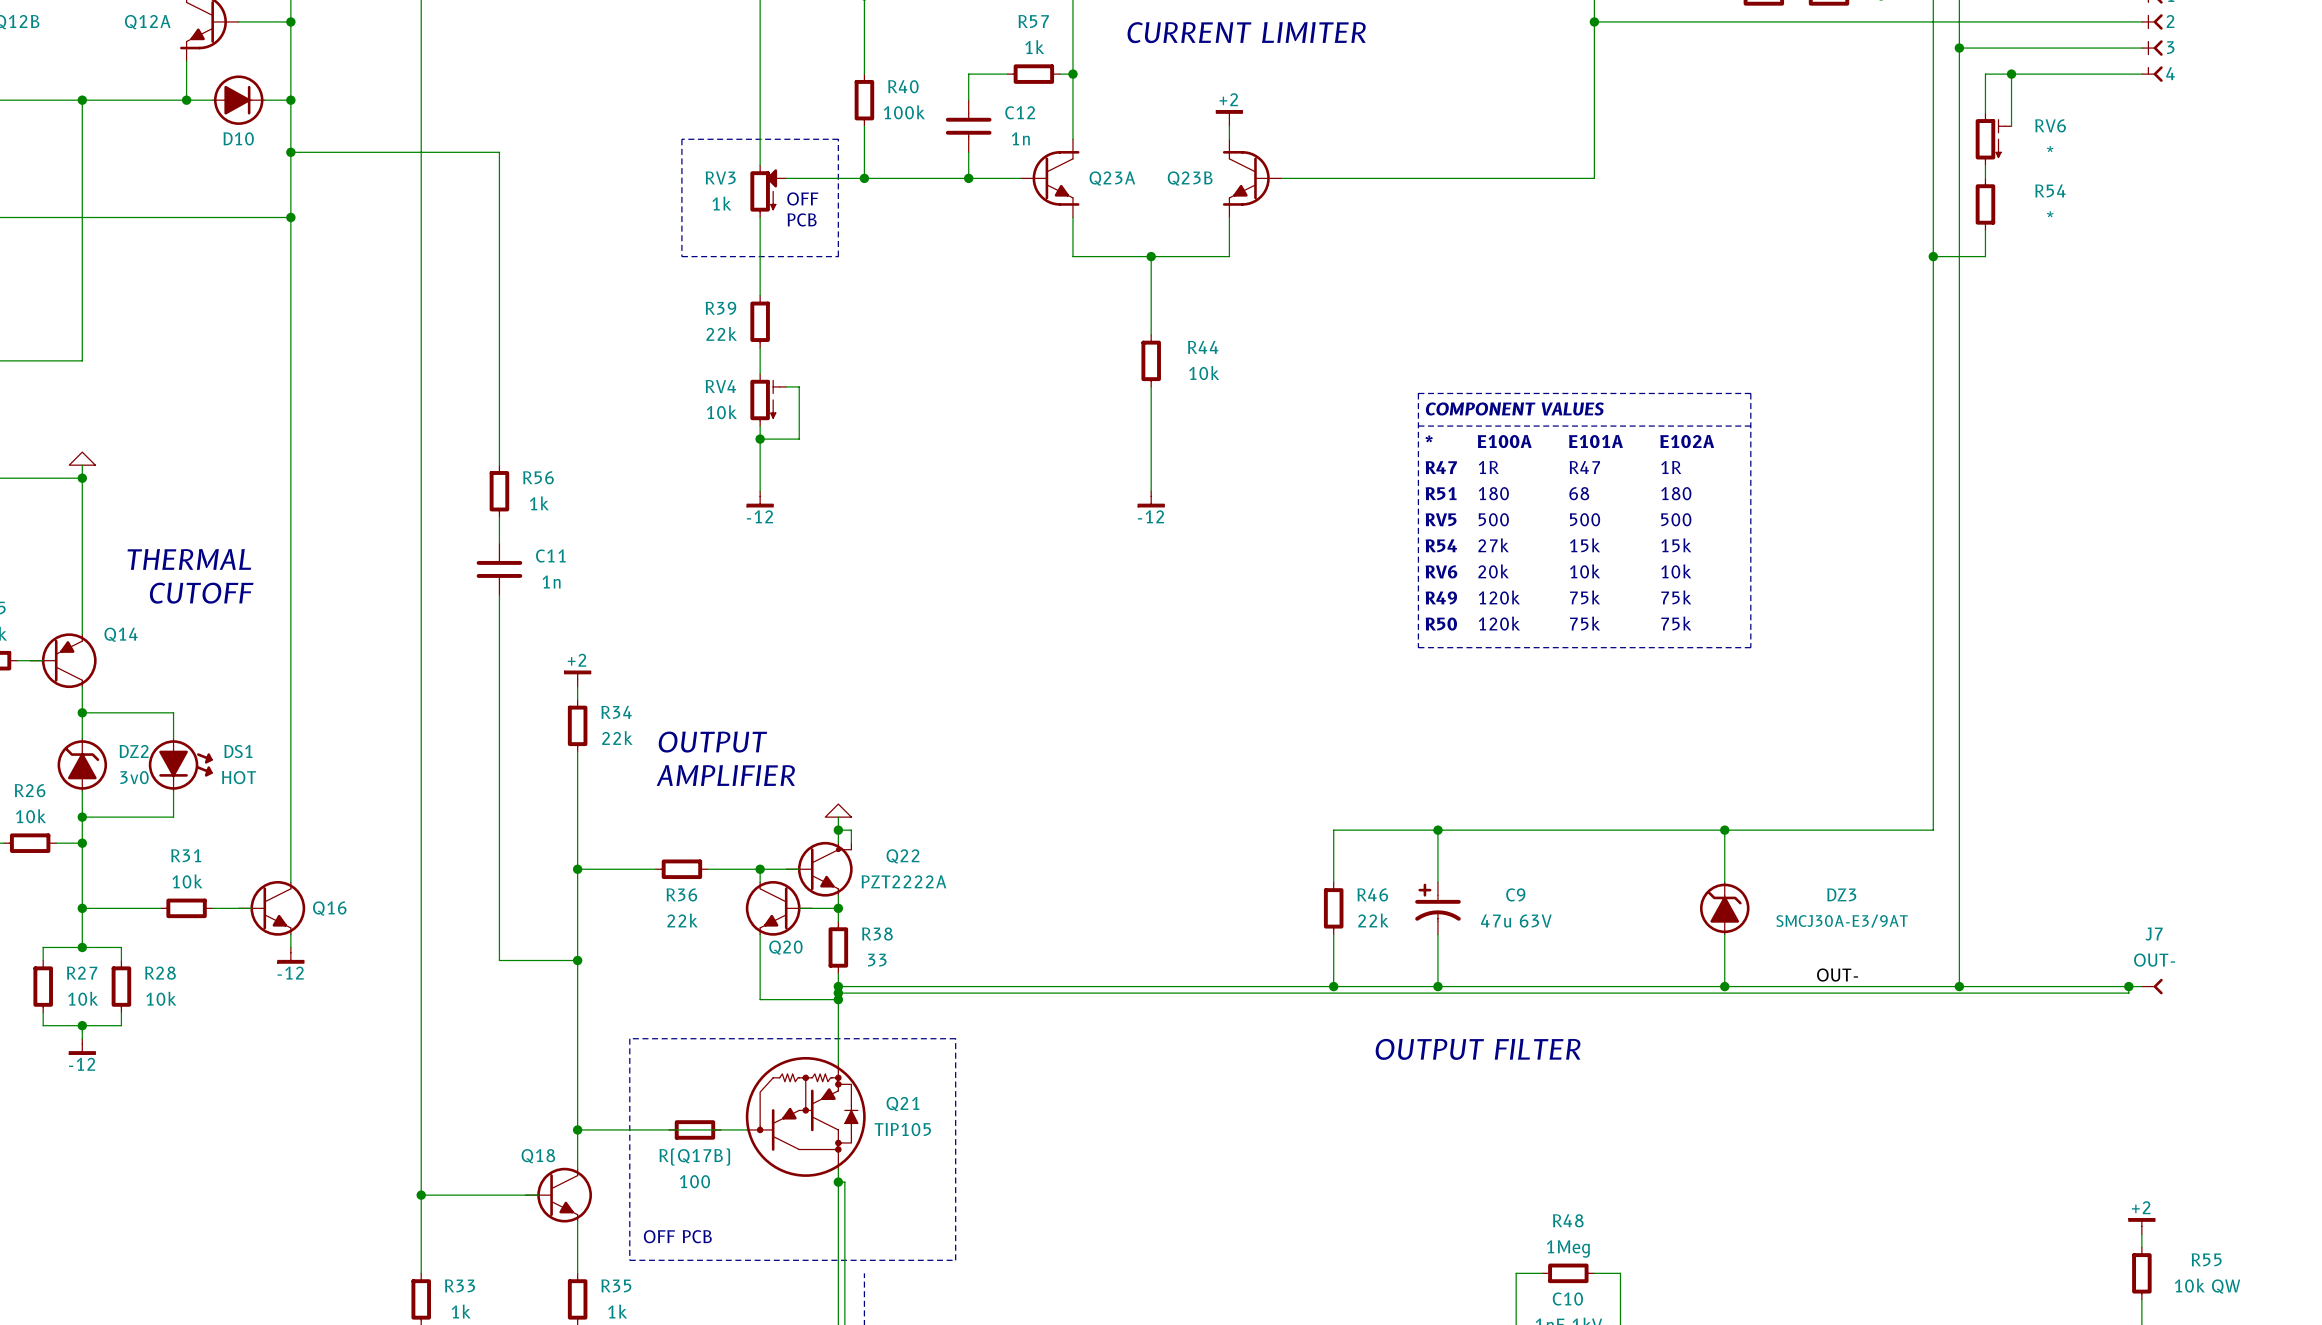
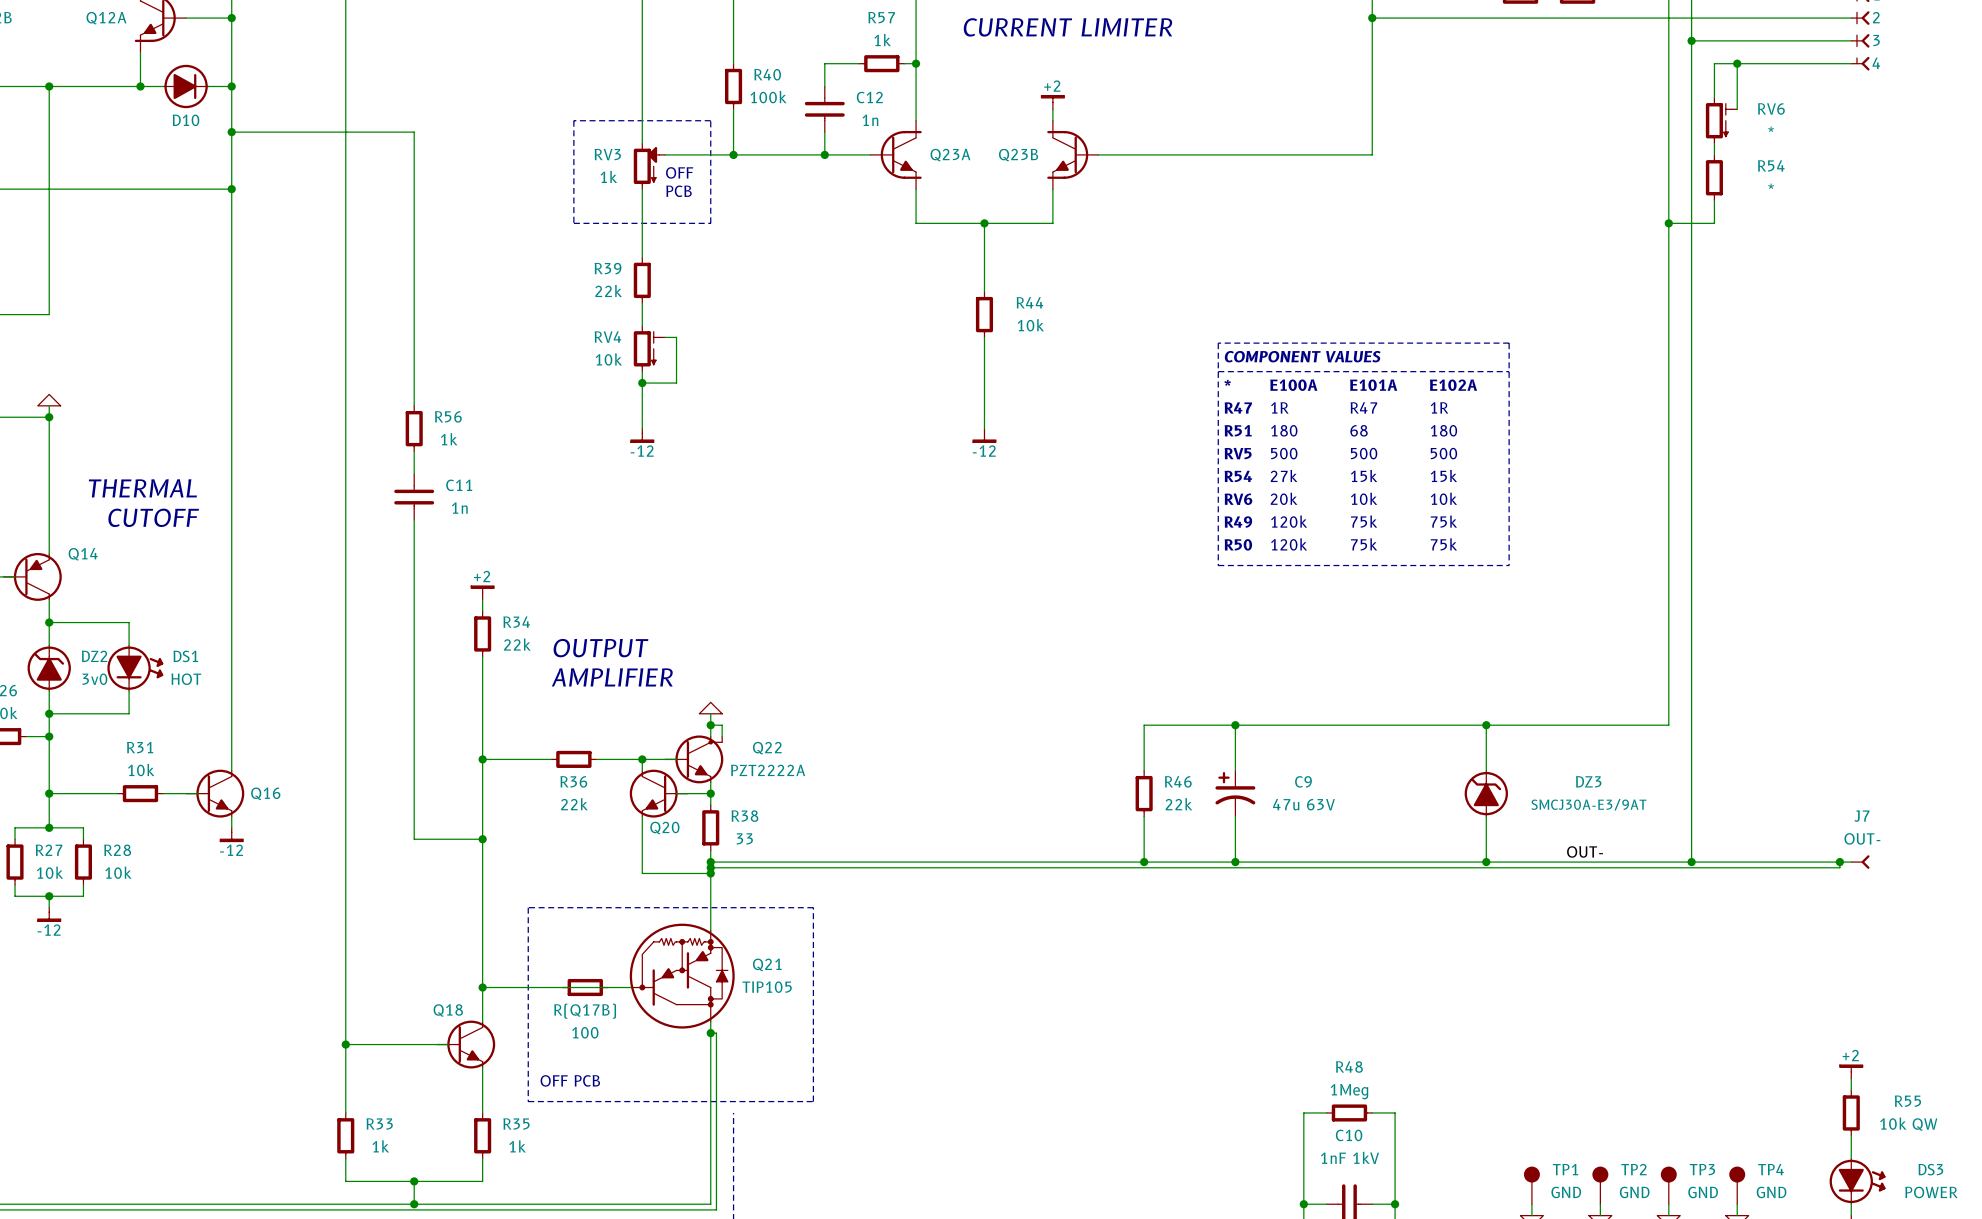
text: OUTPUT FILTER (1478, 1049) -> none

